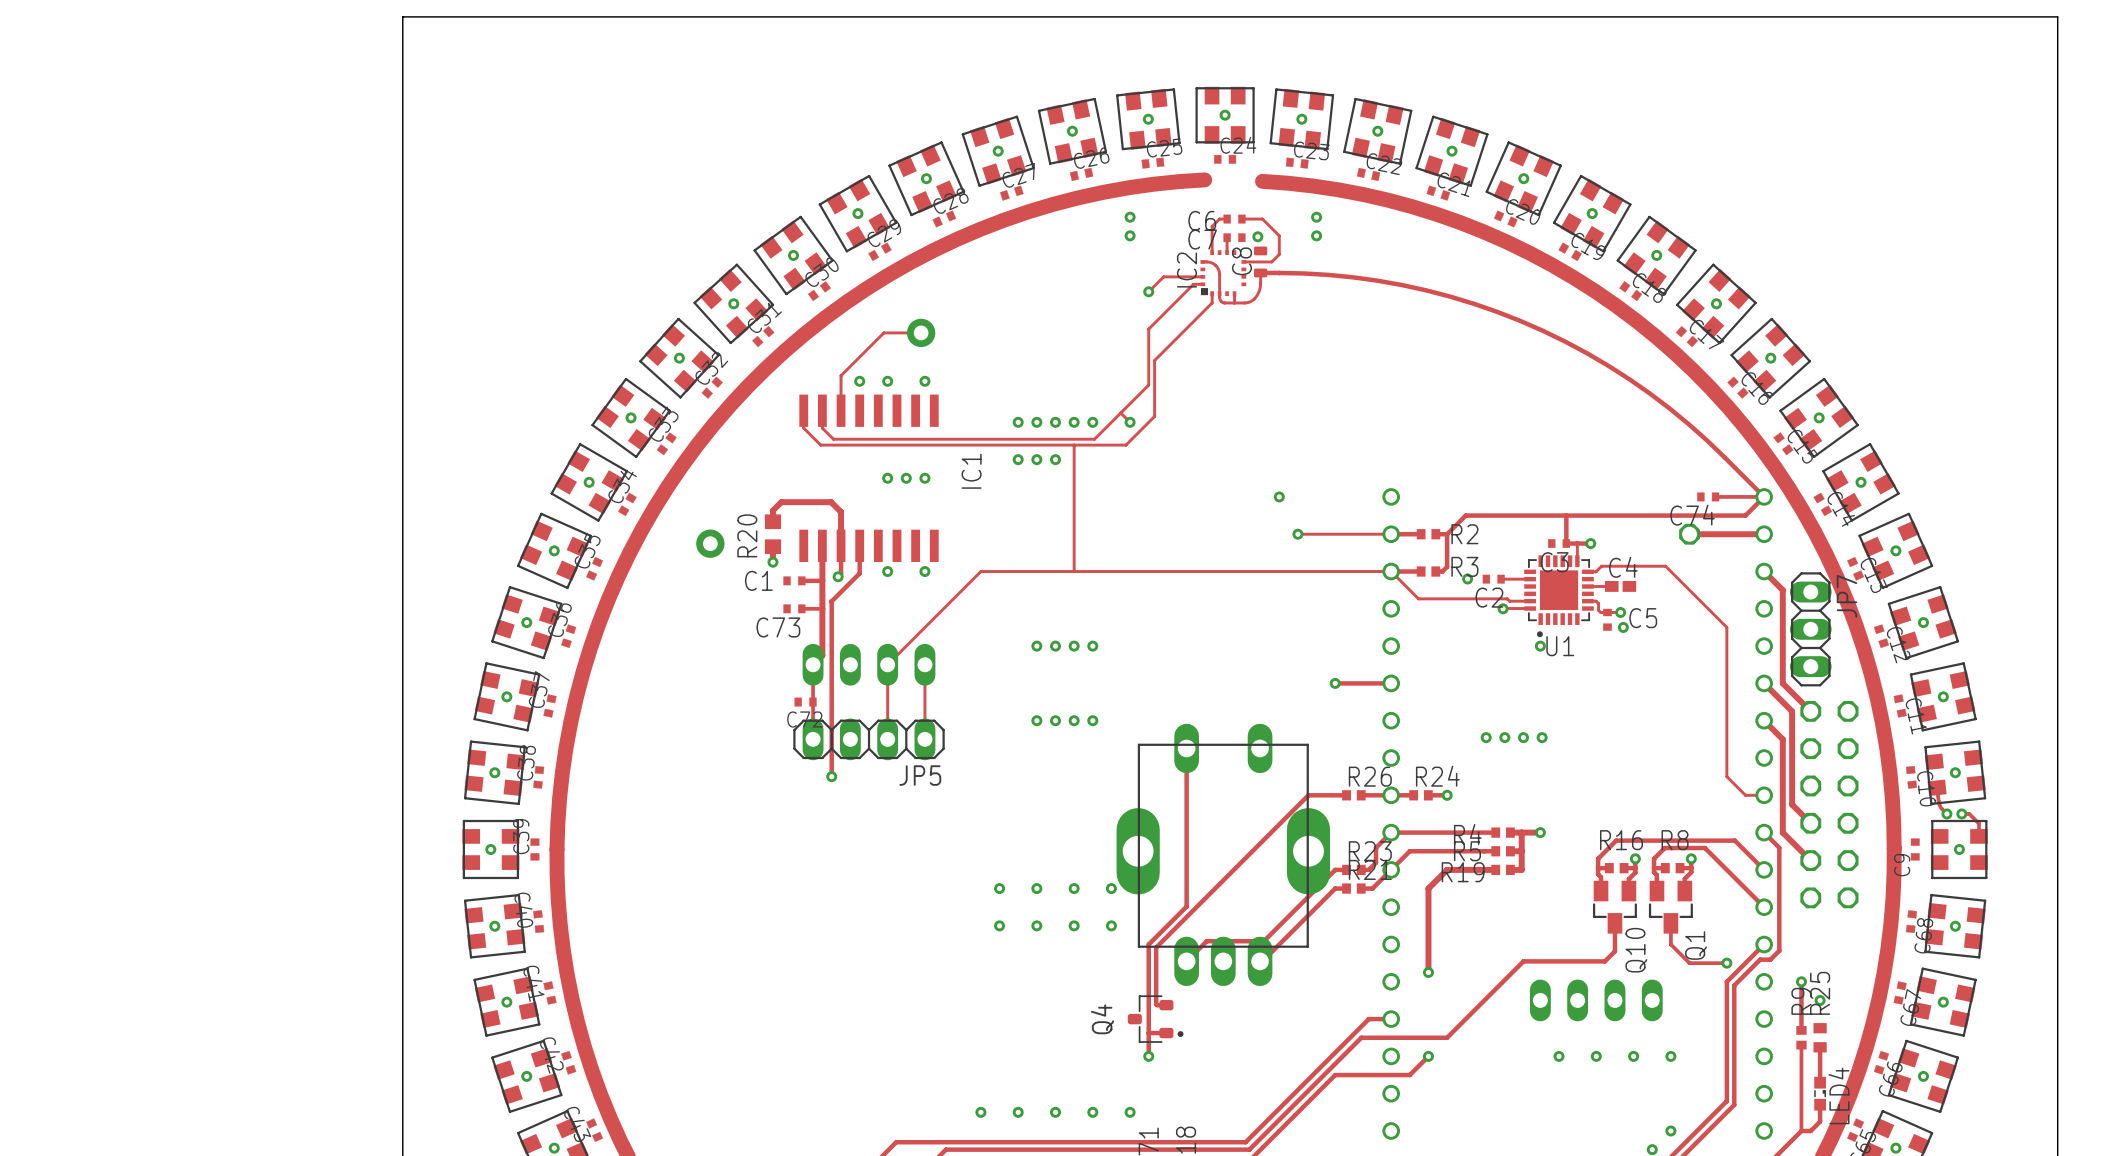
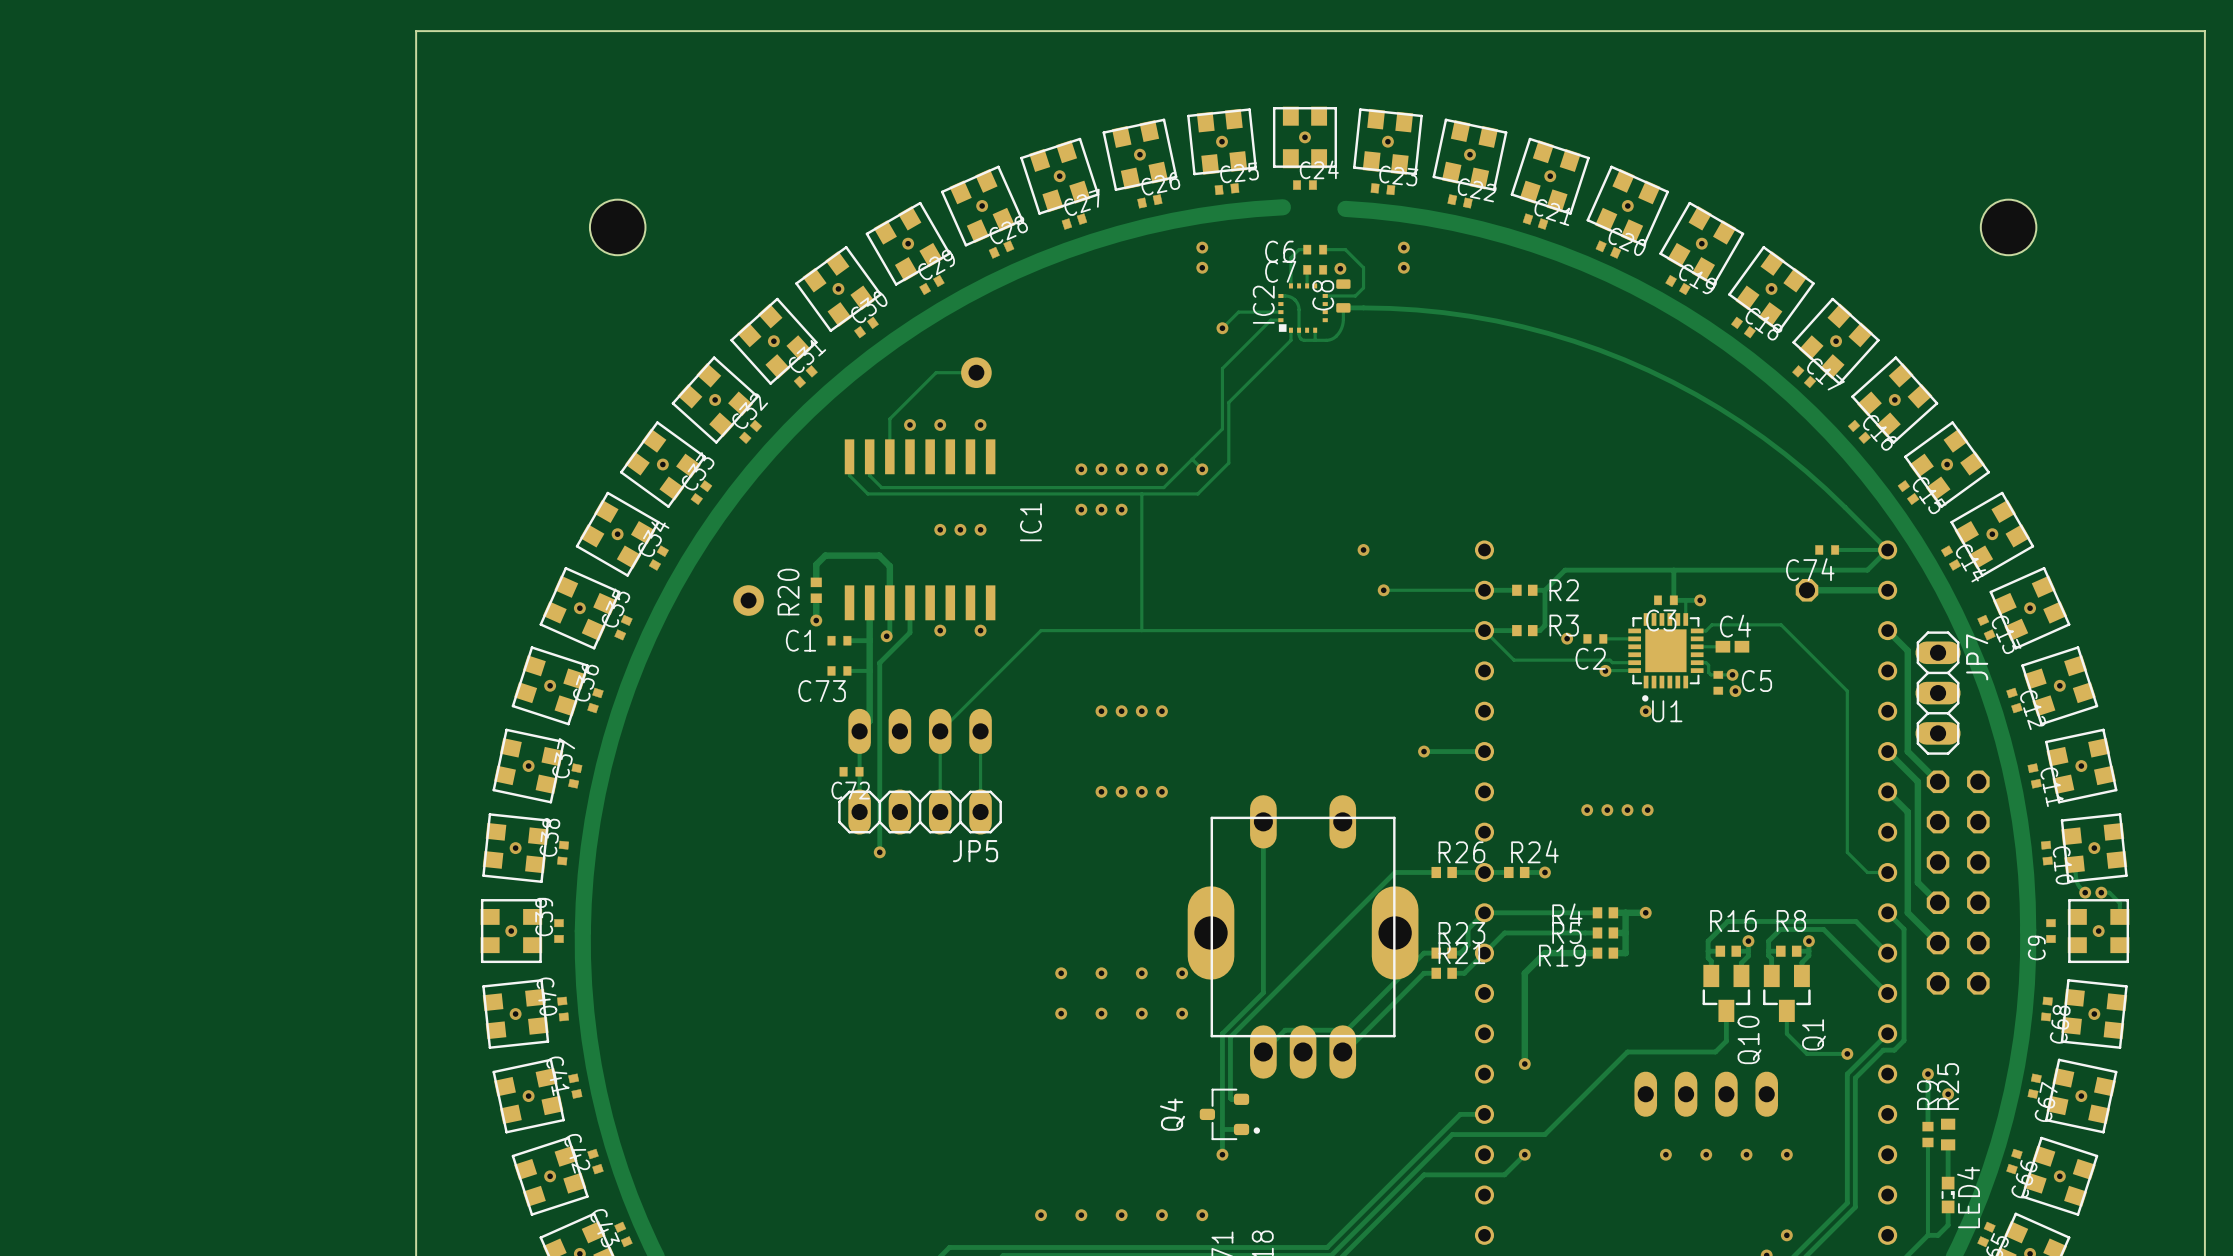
hole: none -> (617, 227)
hole: none -> (2008, 227)
R20 footprint: [764, 514, 782, 555] -> [810, 577, 822, 603]

